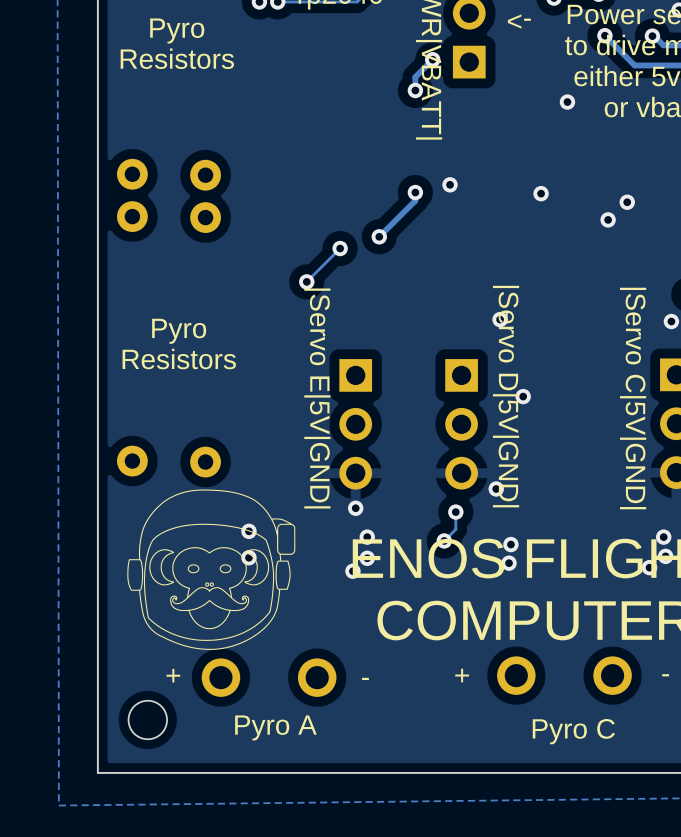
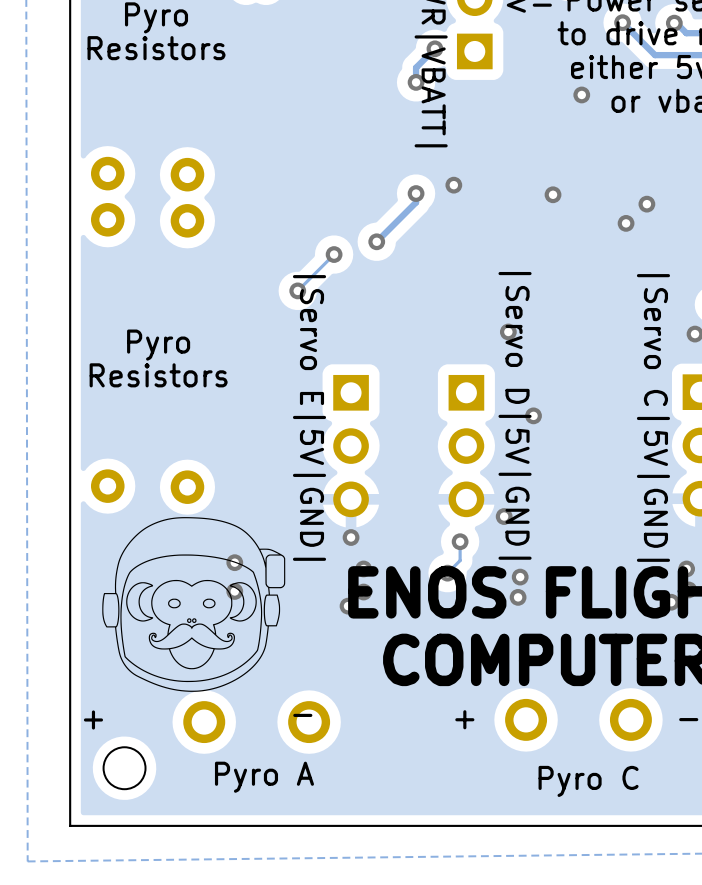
text position: + (173, 675) -> + (93, 719)
text position: - (365, 678) -> - (302, 715)

